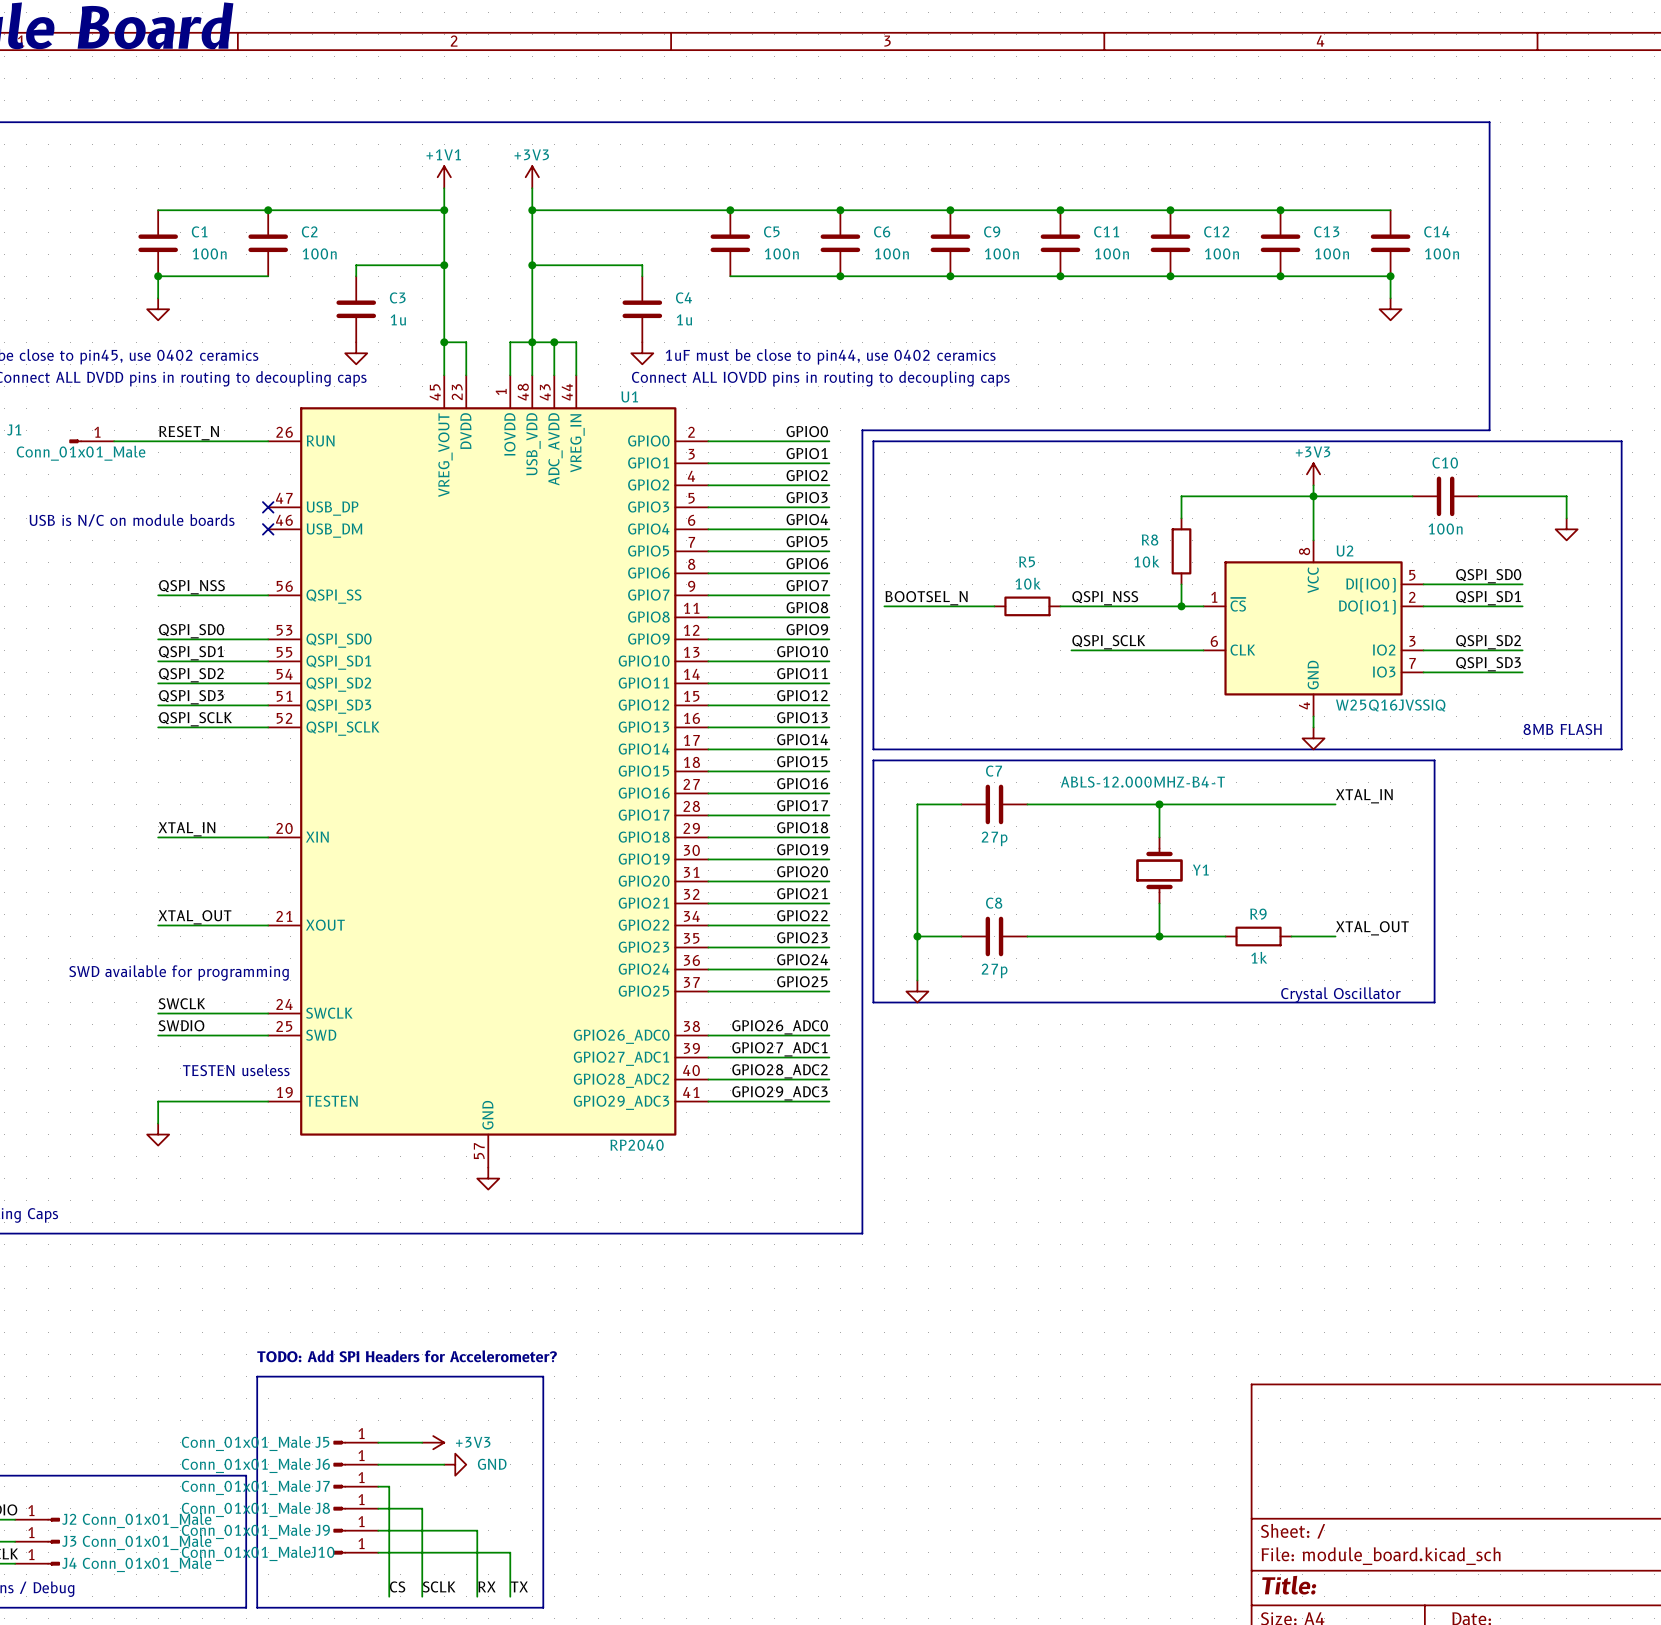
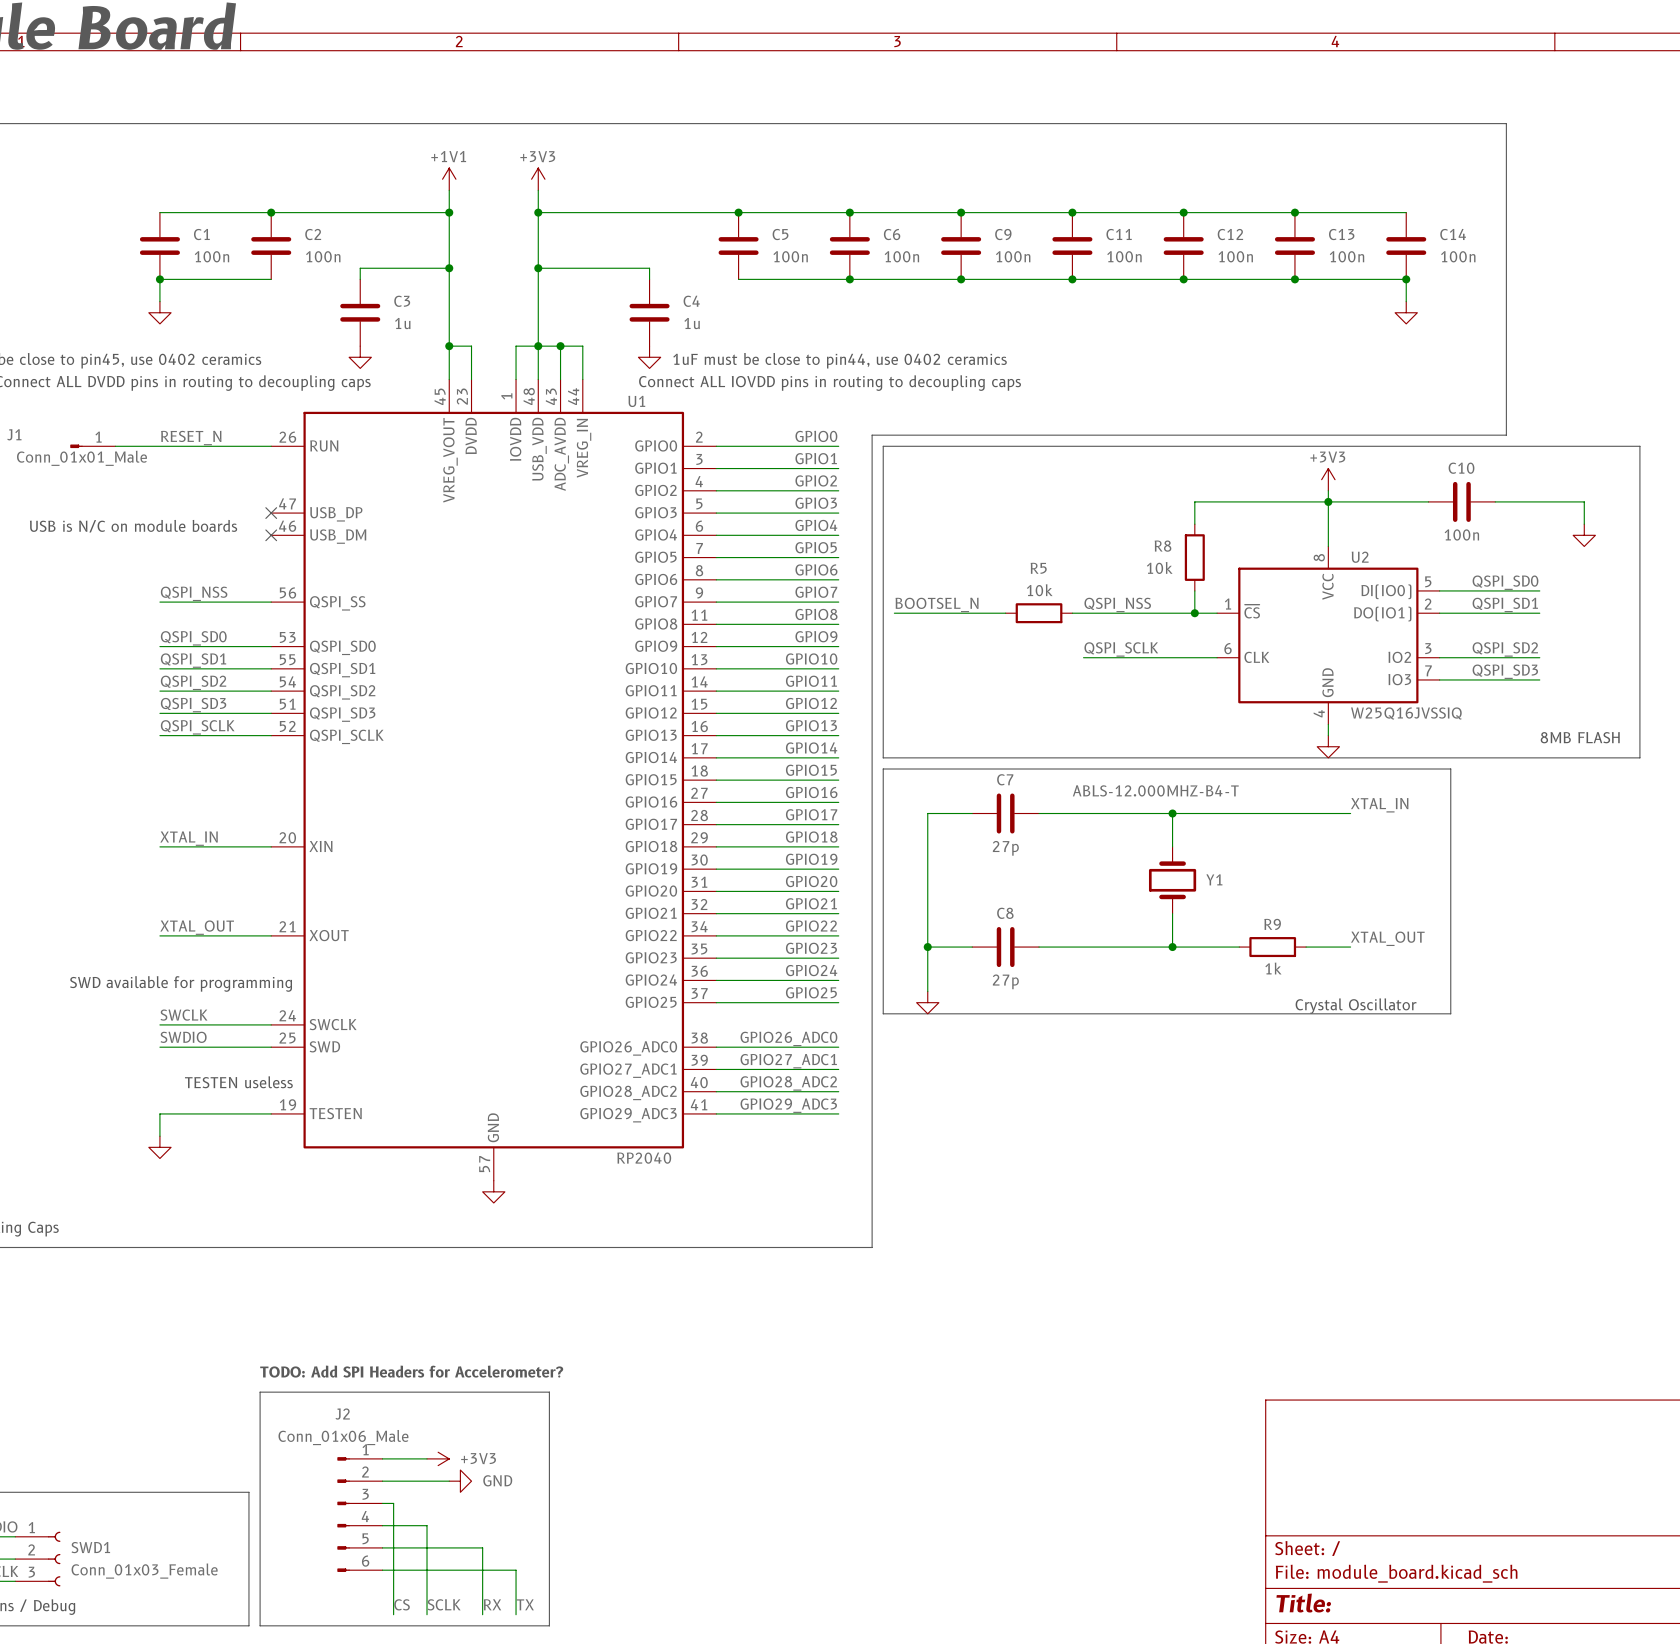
J5: Conn_01x01_Male (355, 1442) -> none
J6: Conn_01x01_Male (355, 1464) -> none
J7: Conn_01x01_Male (355, 1486) -> none
J8: Conn_01x01_Male (355, 1508) -> none
J2 symbol: [15, 1517, 60, 1522] -> [337, 1457, 383, 1572]
J2 name position: J2 (69, 1519) -> J2 (342, 1414)
J2 value: Conn_01x01_Male (147, 1520) -> Conn_01x06_Male (343, 1437)
J9: Conn_01x01_Male (355, 1530) -> none
J3: Conn_01x01_Male (37, 1541) -> none
SWD1: none -> Conn_01x03_Female (37, 1559)
J10: Conn_01x01_Male (355, 1552) -> none
J4: Conn_01x01_Male (37, 1563) -> none

